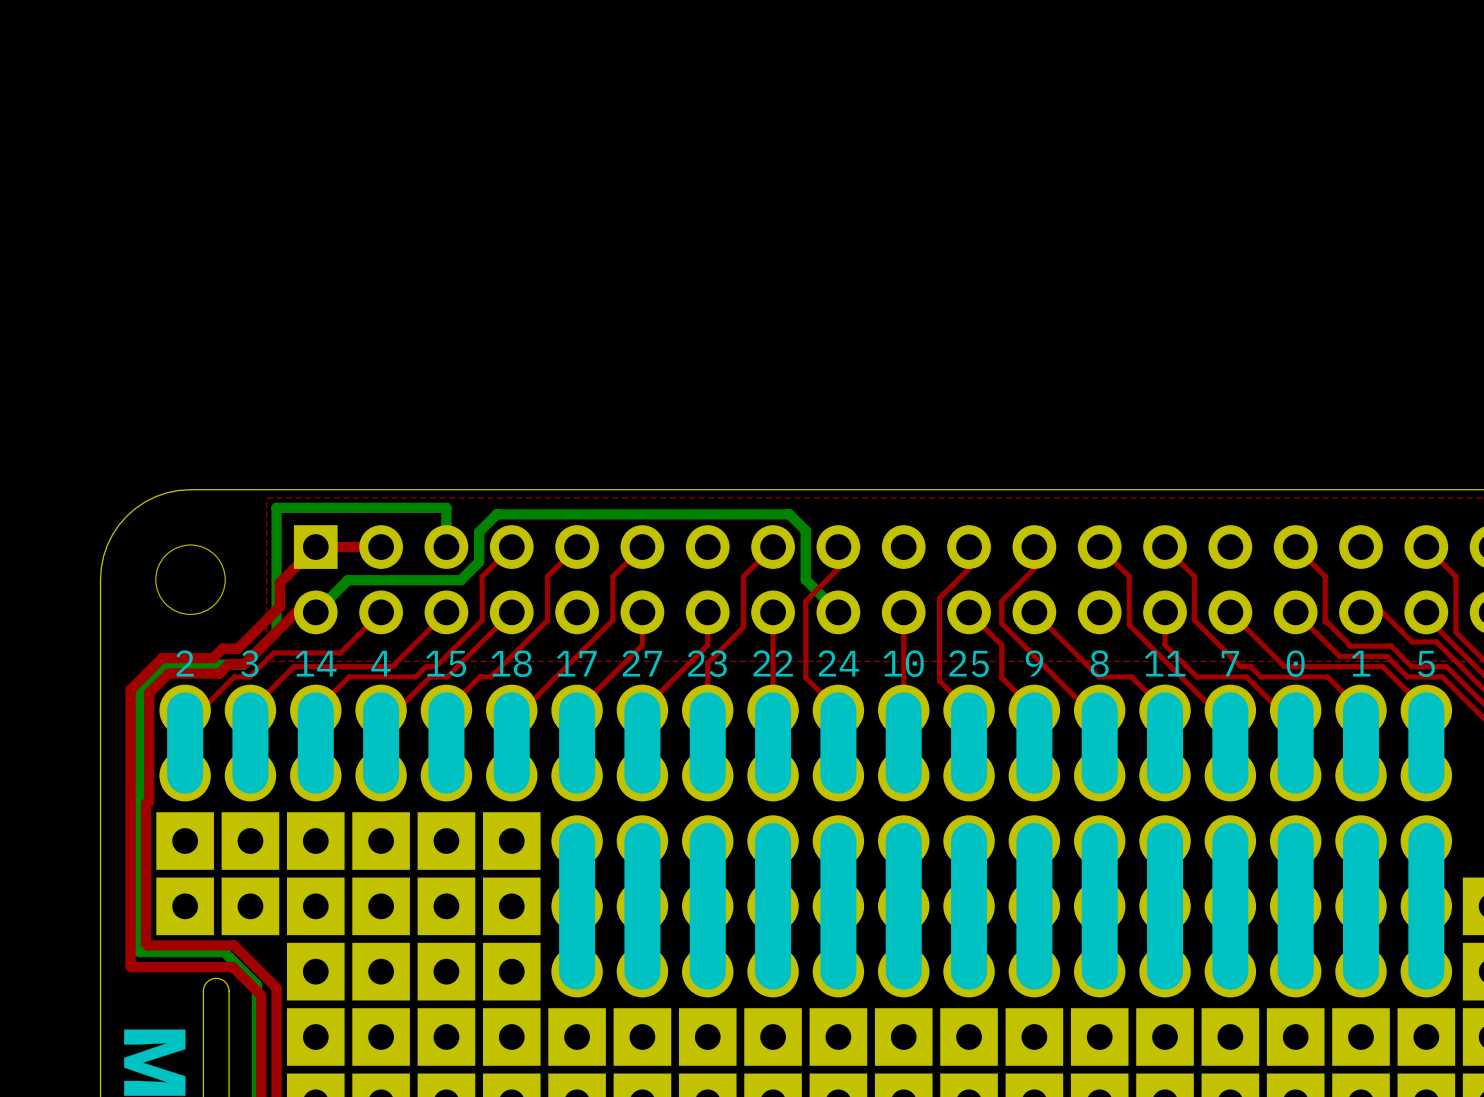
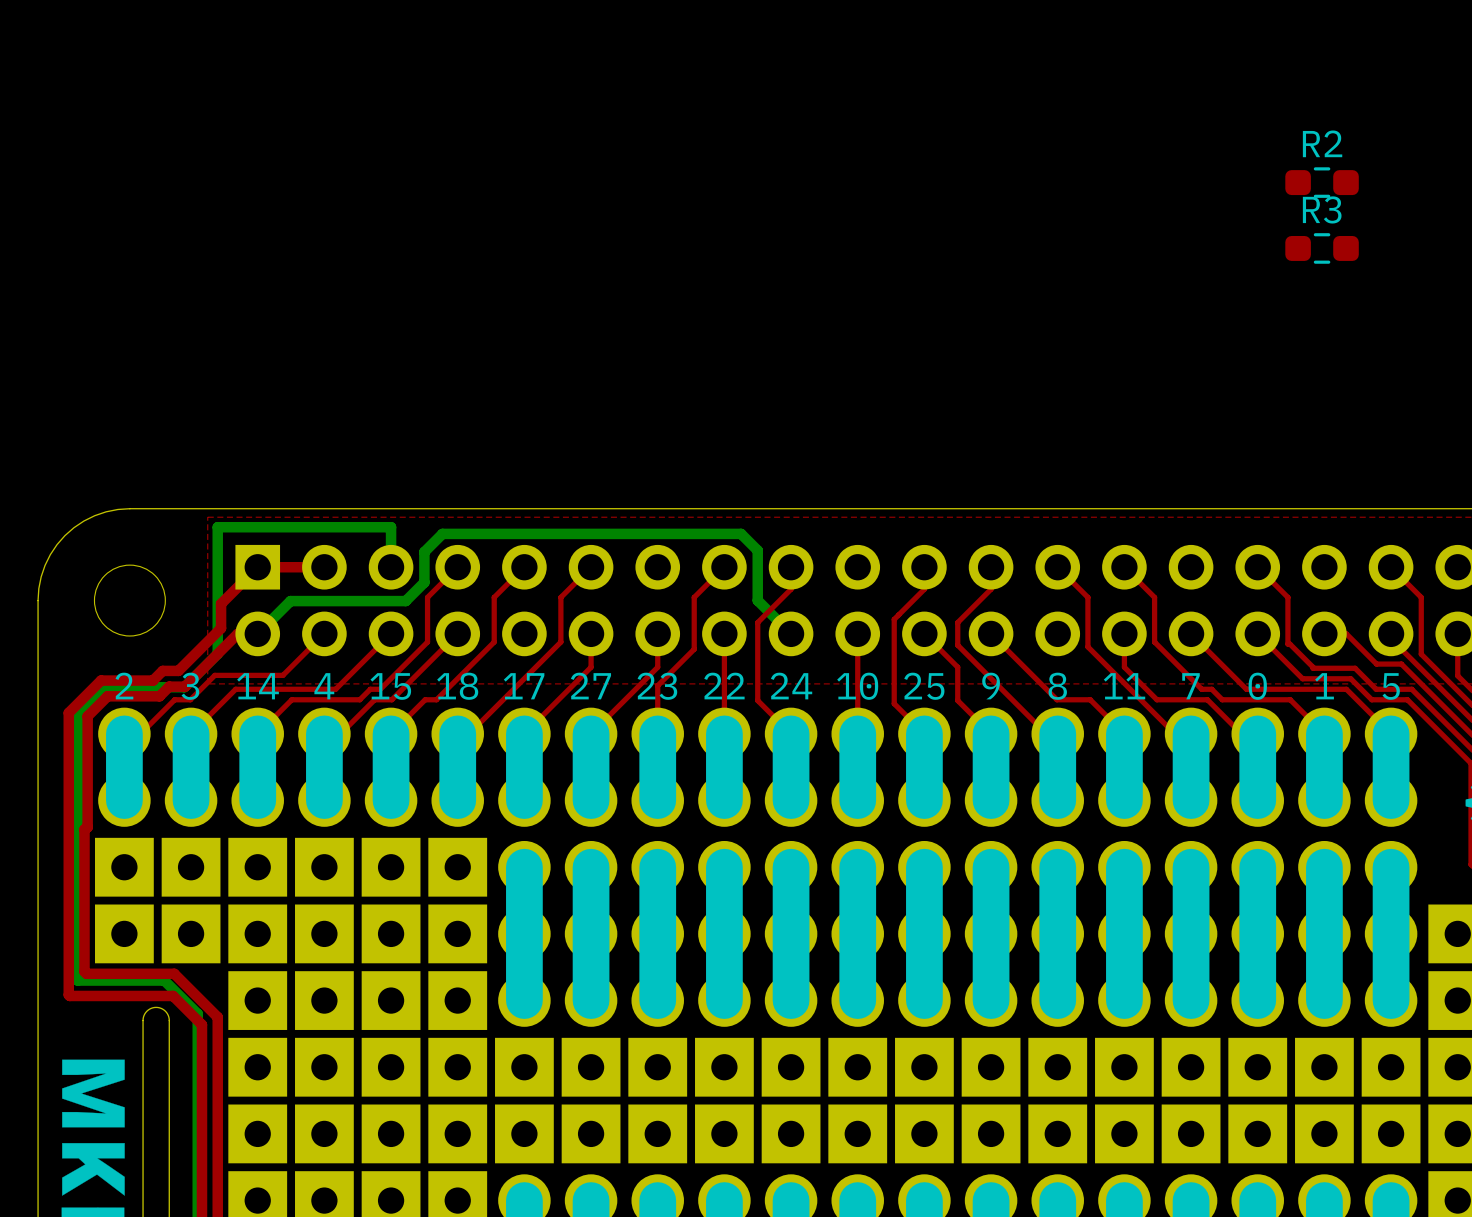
R2: none -> (1322, 182)
R3: none -> (1322, 248)

